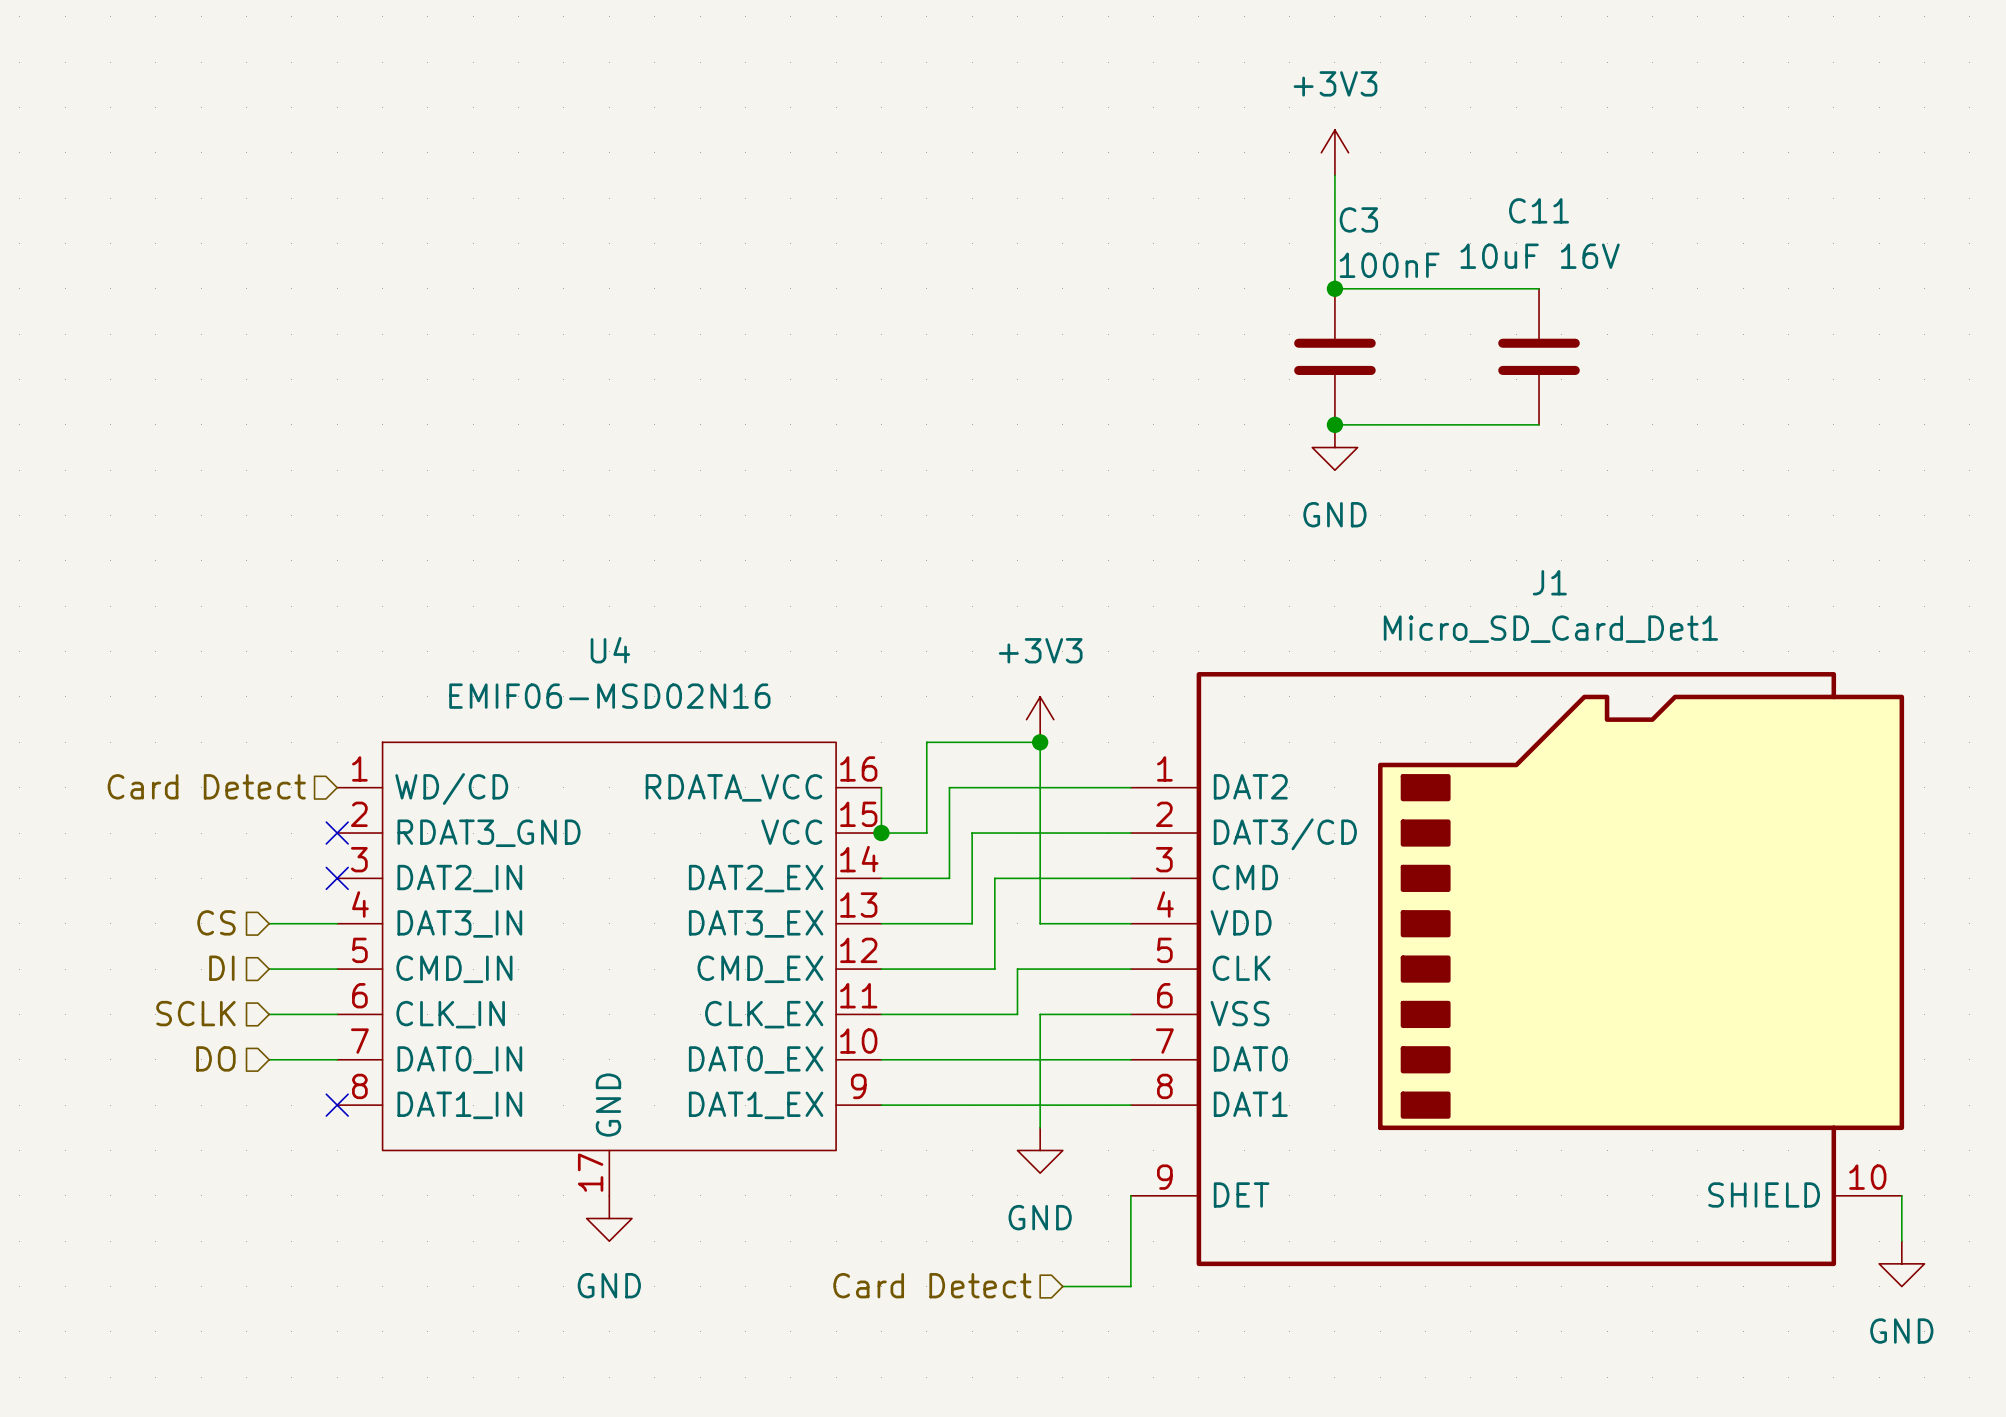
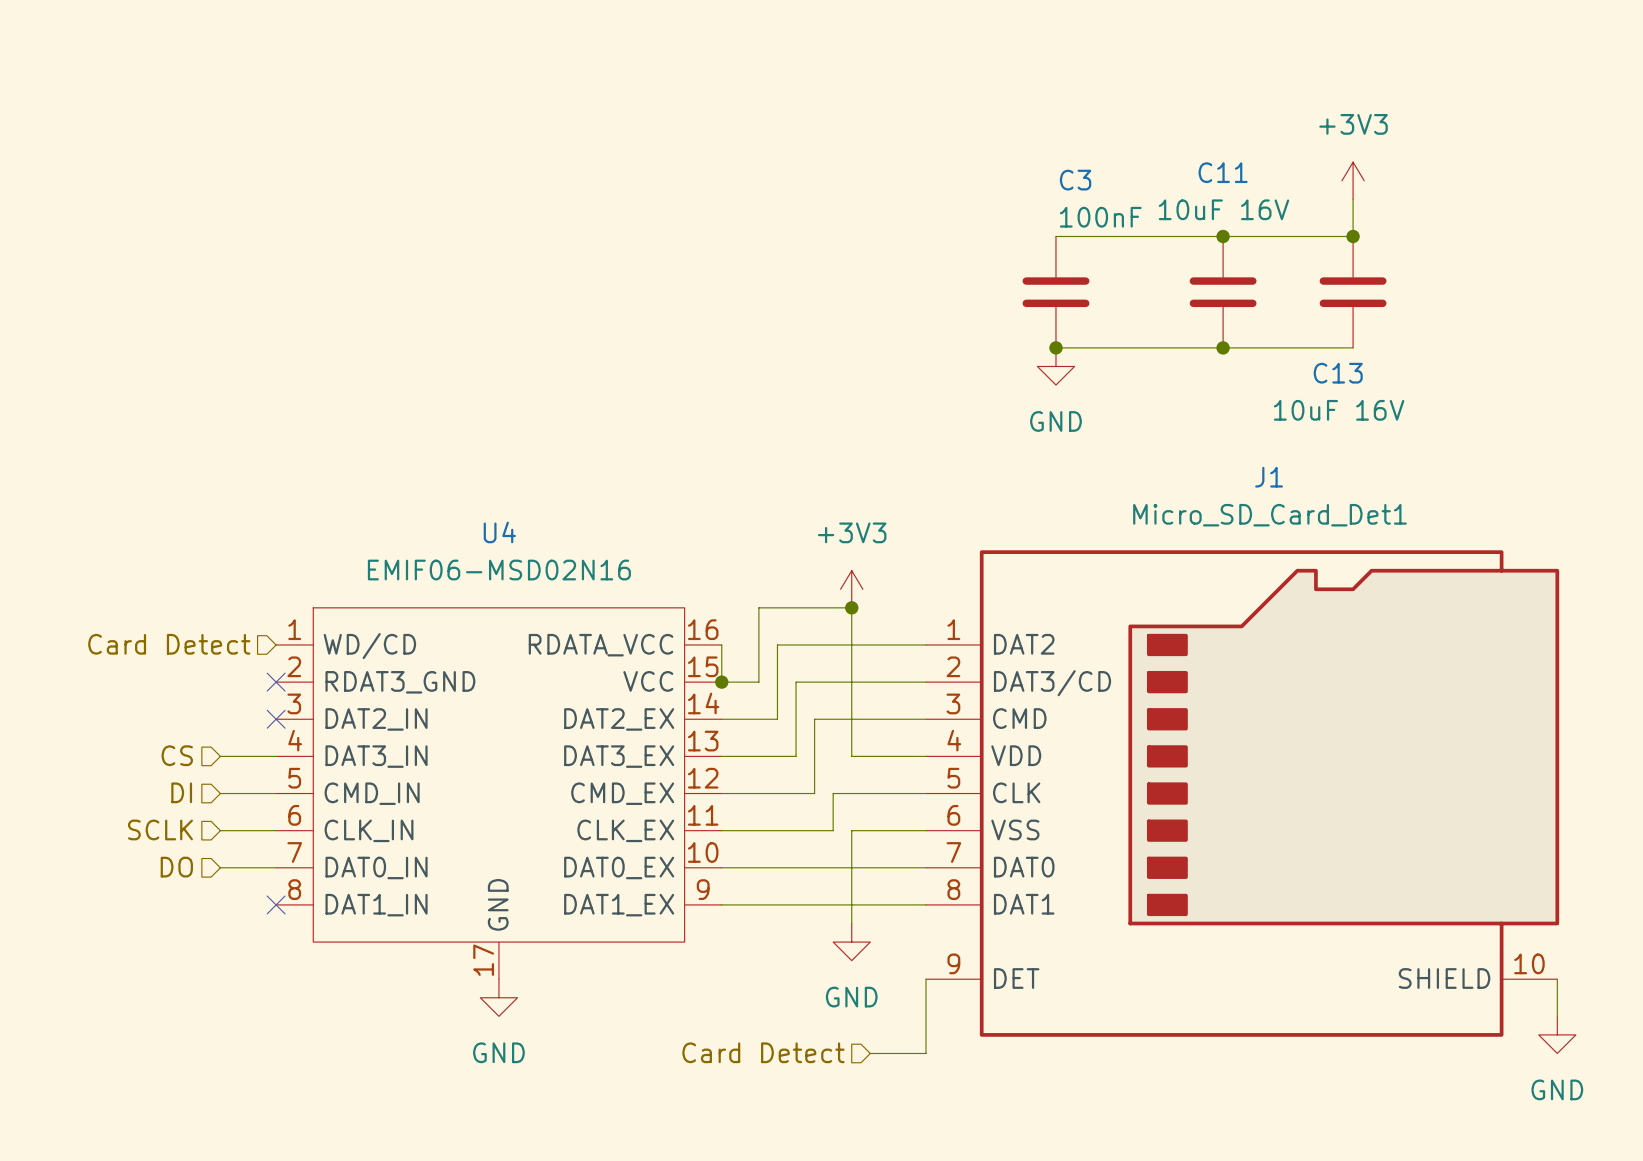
power symbol position: +3V3 (1334, 152) -> +3V3 (1353, 180)
wire: (1334, 175) (1334, 288) -> (1055, 236) (1093, 236)
wire: none -> (1353, 199) (1353, 236) (1260, 236)
junction: (1334, 288) -> none
junction: none -> (1223, 236)
junction: none -> (1353, 236)
C3 position: (1334, 356) -> (1055, 292)
C11 position: (1539, 356) -> (1223, 292)
C13: none -> 10uF 16V (1353, 292)
wire: none -> (1055, 347) (1093, 347)
junction position: (1334, 424) -> (1055, 347)
junction: none -> (1223, 347)
wire: none -> (1260, 347) (1353, 347)
power symbol position: GND (1334, 447) -> GND (1055, 366)

